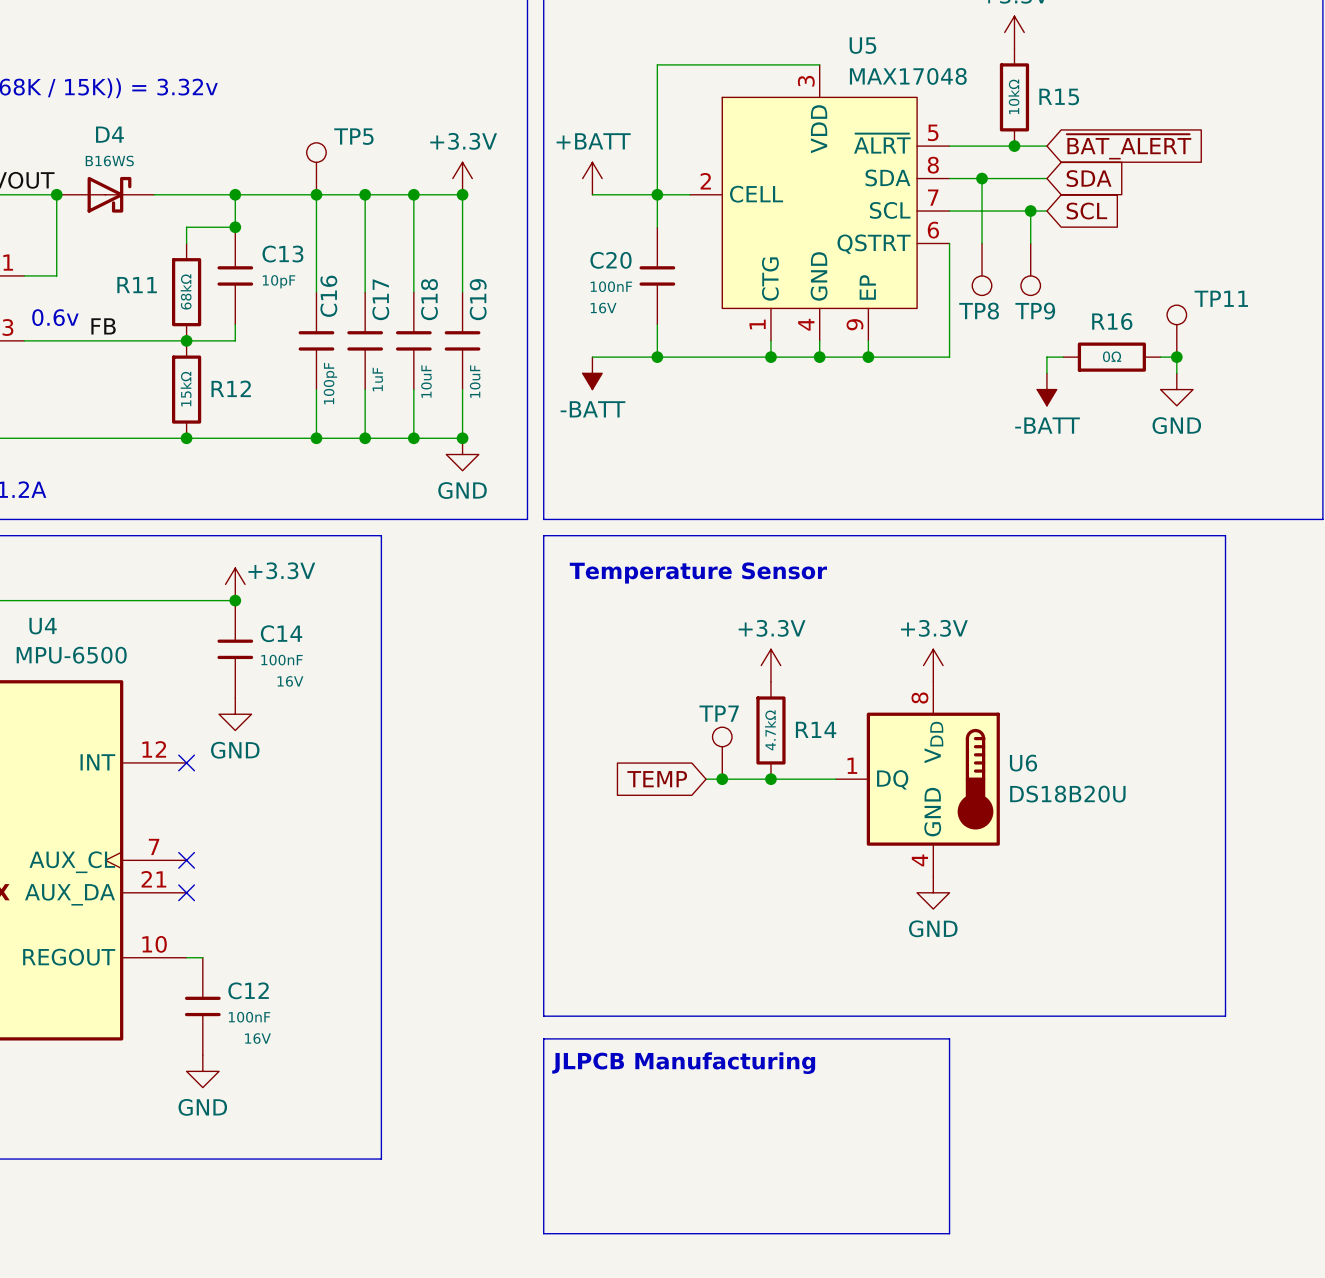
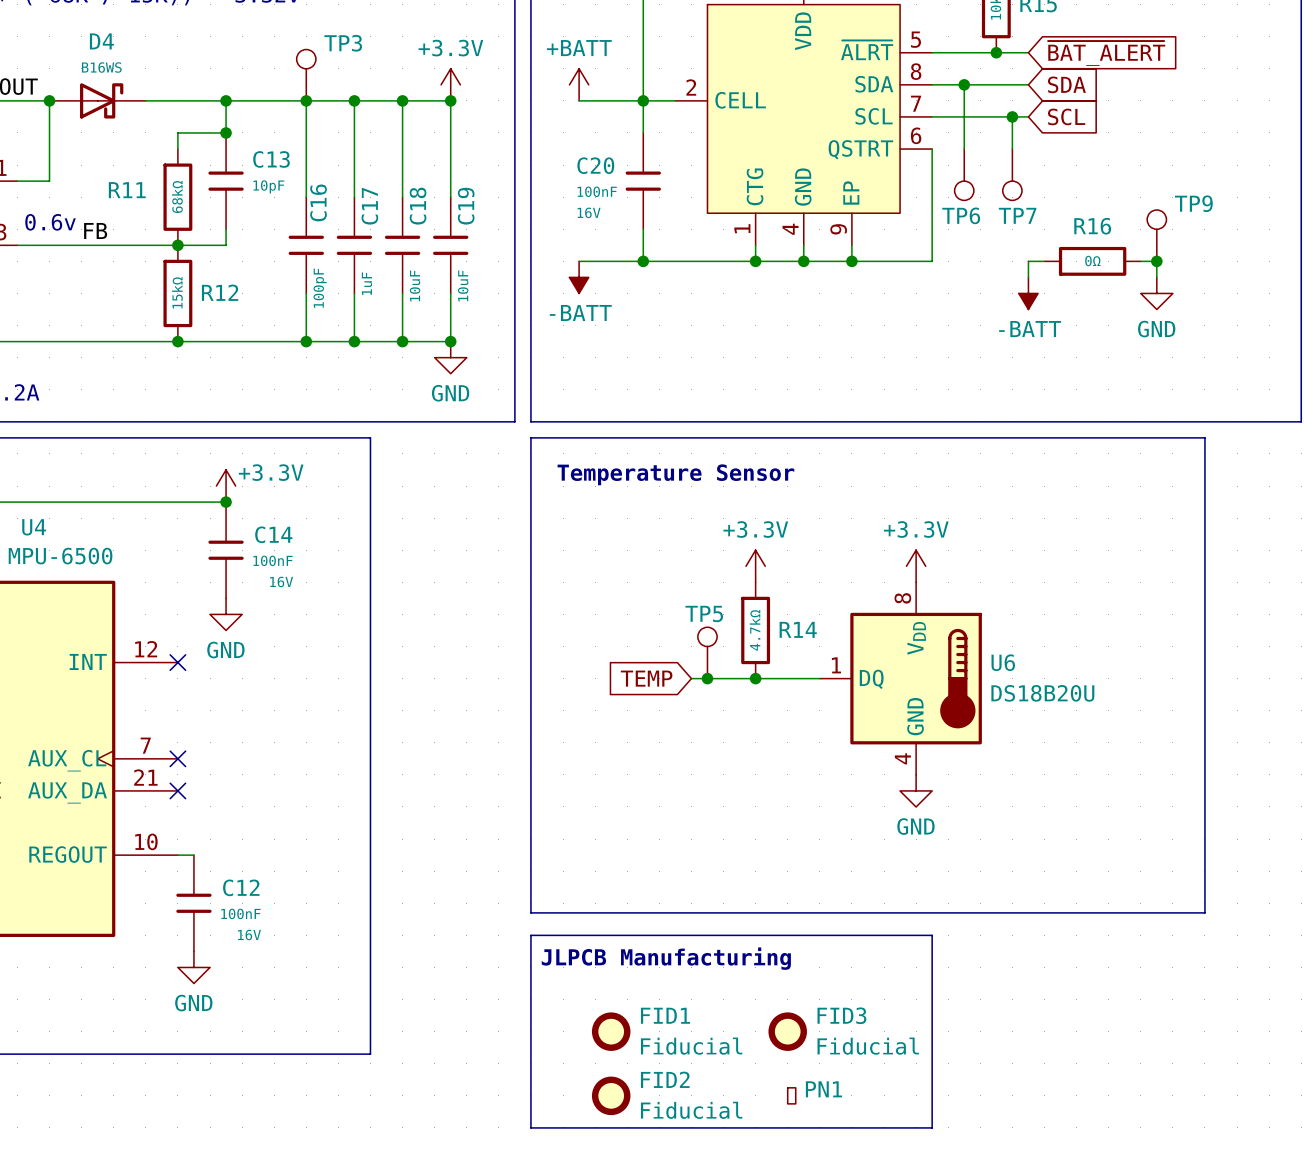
TP5 name: TP5 (353, 136) -> TP3 (343, 43)
TP11 name: TP11 (1221, 298) -> TP9 (1193, 203)
TP8 name: TP8 (979, 311) -> TP6 (961, 215)
TP9 name: TP9 (1035, 311) -> TP7 (1017, 215)
TP7 name: TP7 (719, 713) -> TP5 (704, 613)
FID1: none -> Fiducial (611, 1031)
FID3: none -> Fiducial (787, 1031)
FID2: none -> Fiducial (611, 1095)
PN1: none -> (791, 1095)

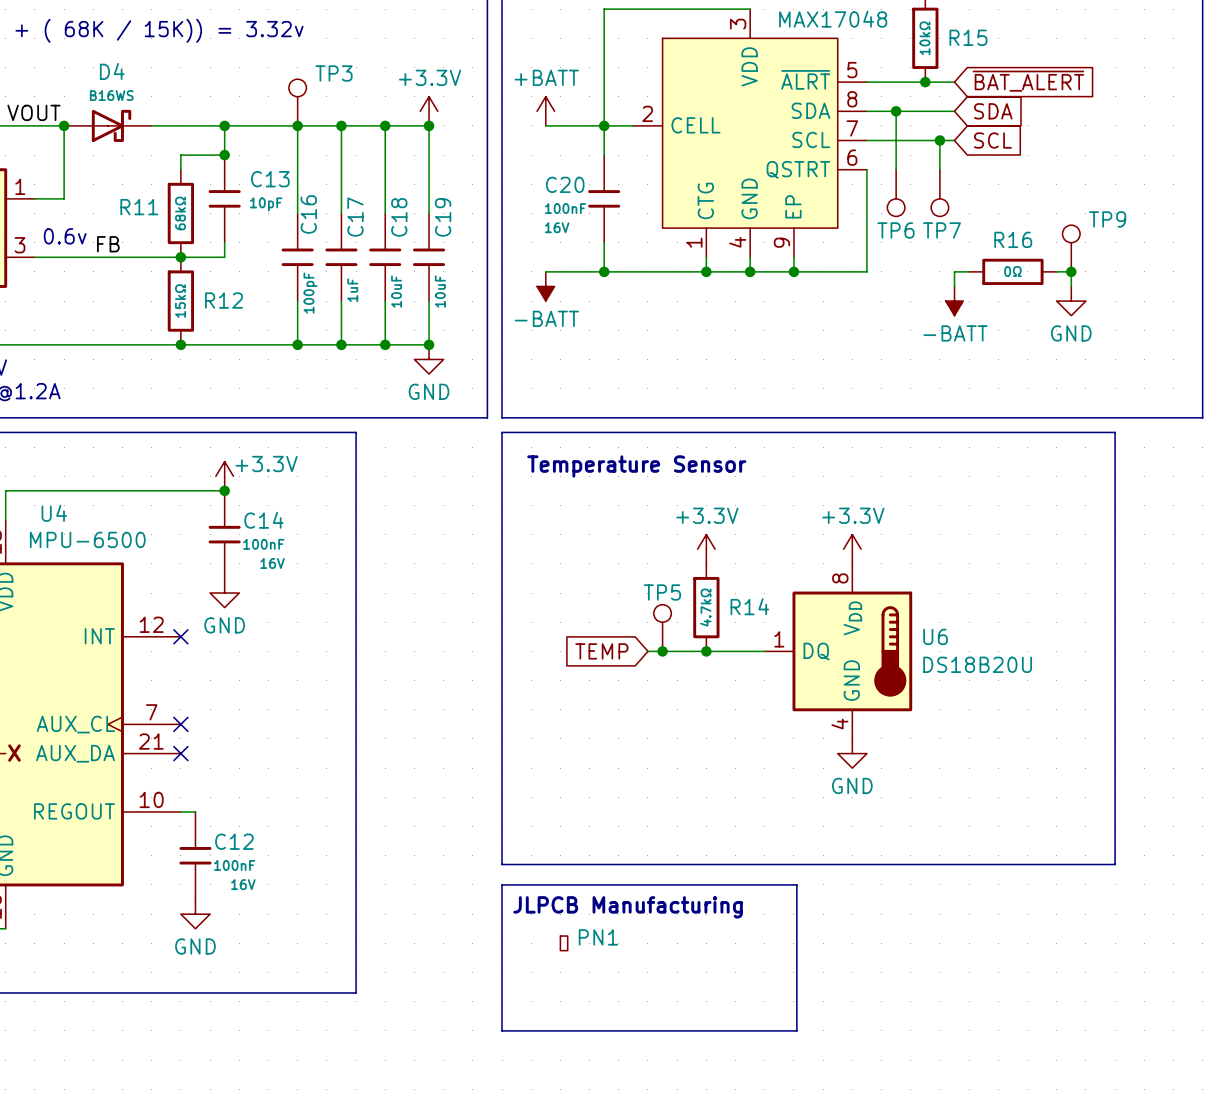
line: (855, 935) (932, 935) (932, 1127) (530, 1127) (530, 1095) -> (796, 884) (796, 1030) (502, 1030)
FID1: Fiducial (611, 1031) -> none
FID3: Fiducial (787, 1031) -> none
FID2: Fiducial (611, 1095) -> none
PN1 position: (791, 1095) -> (564, 943)

